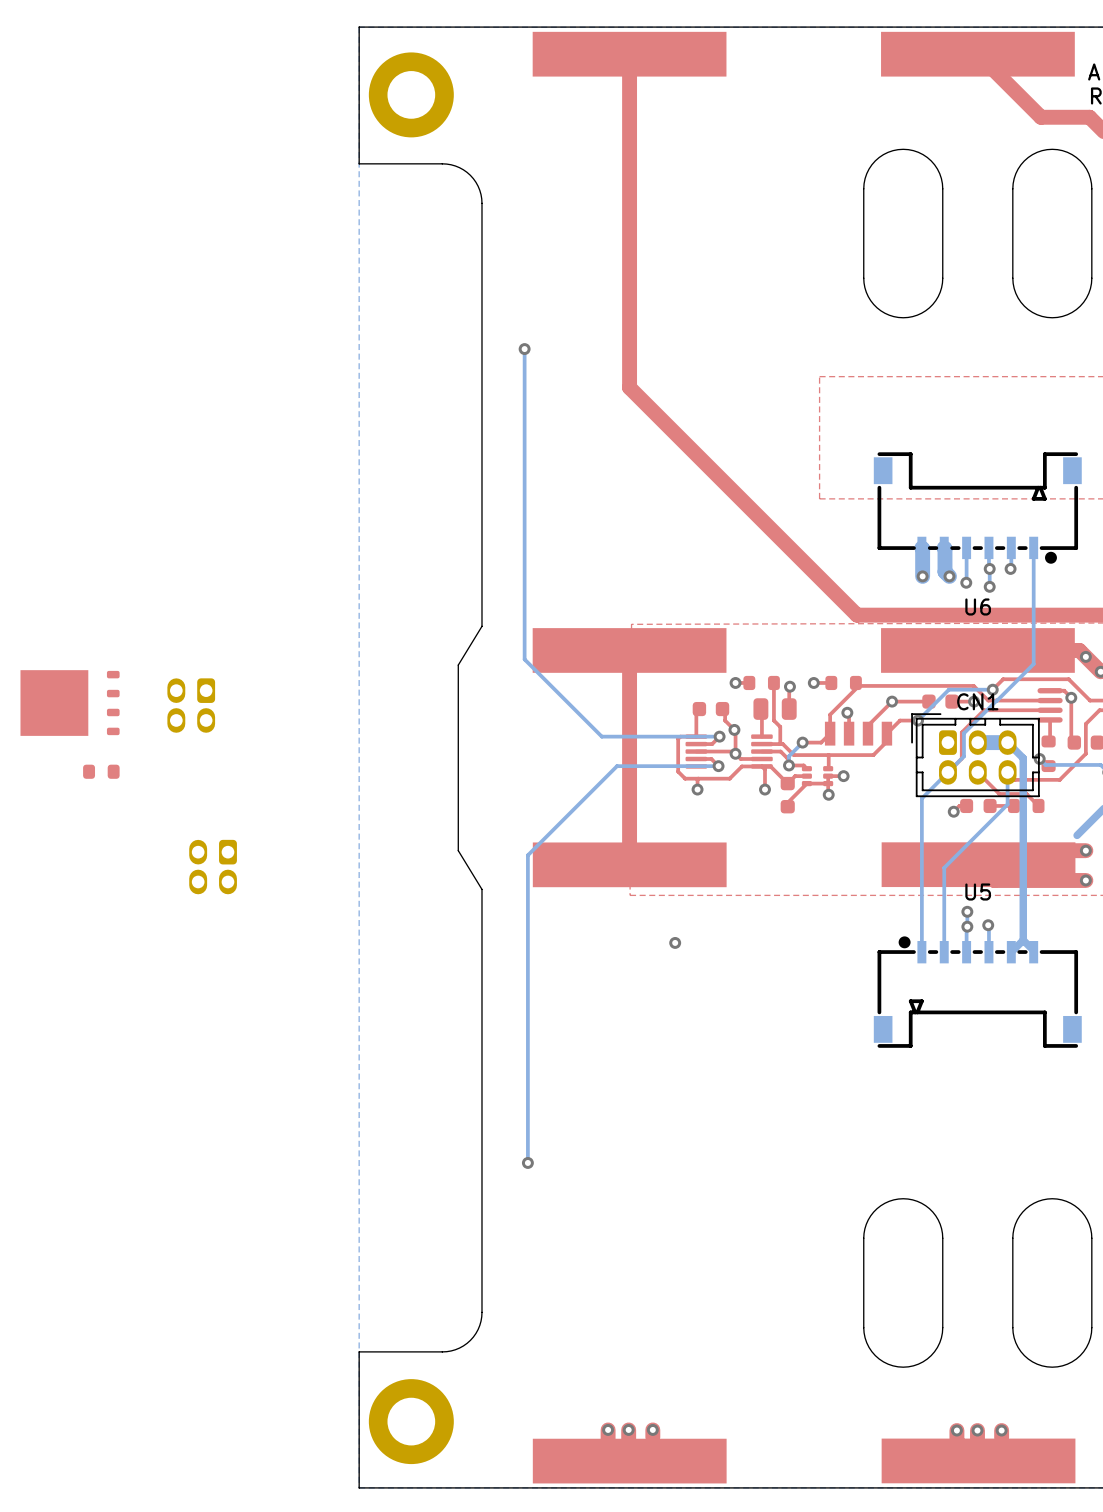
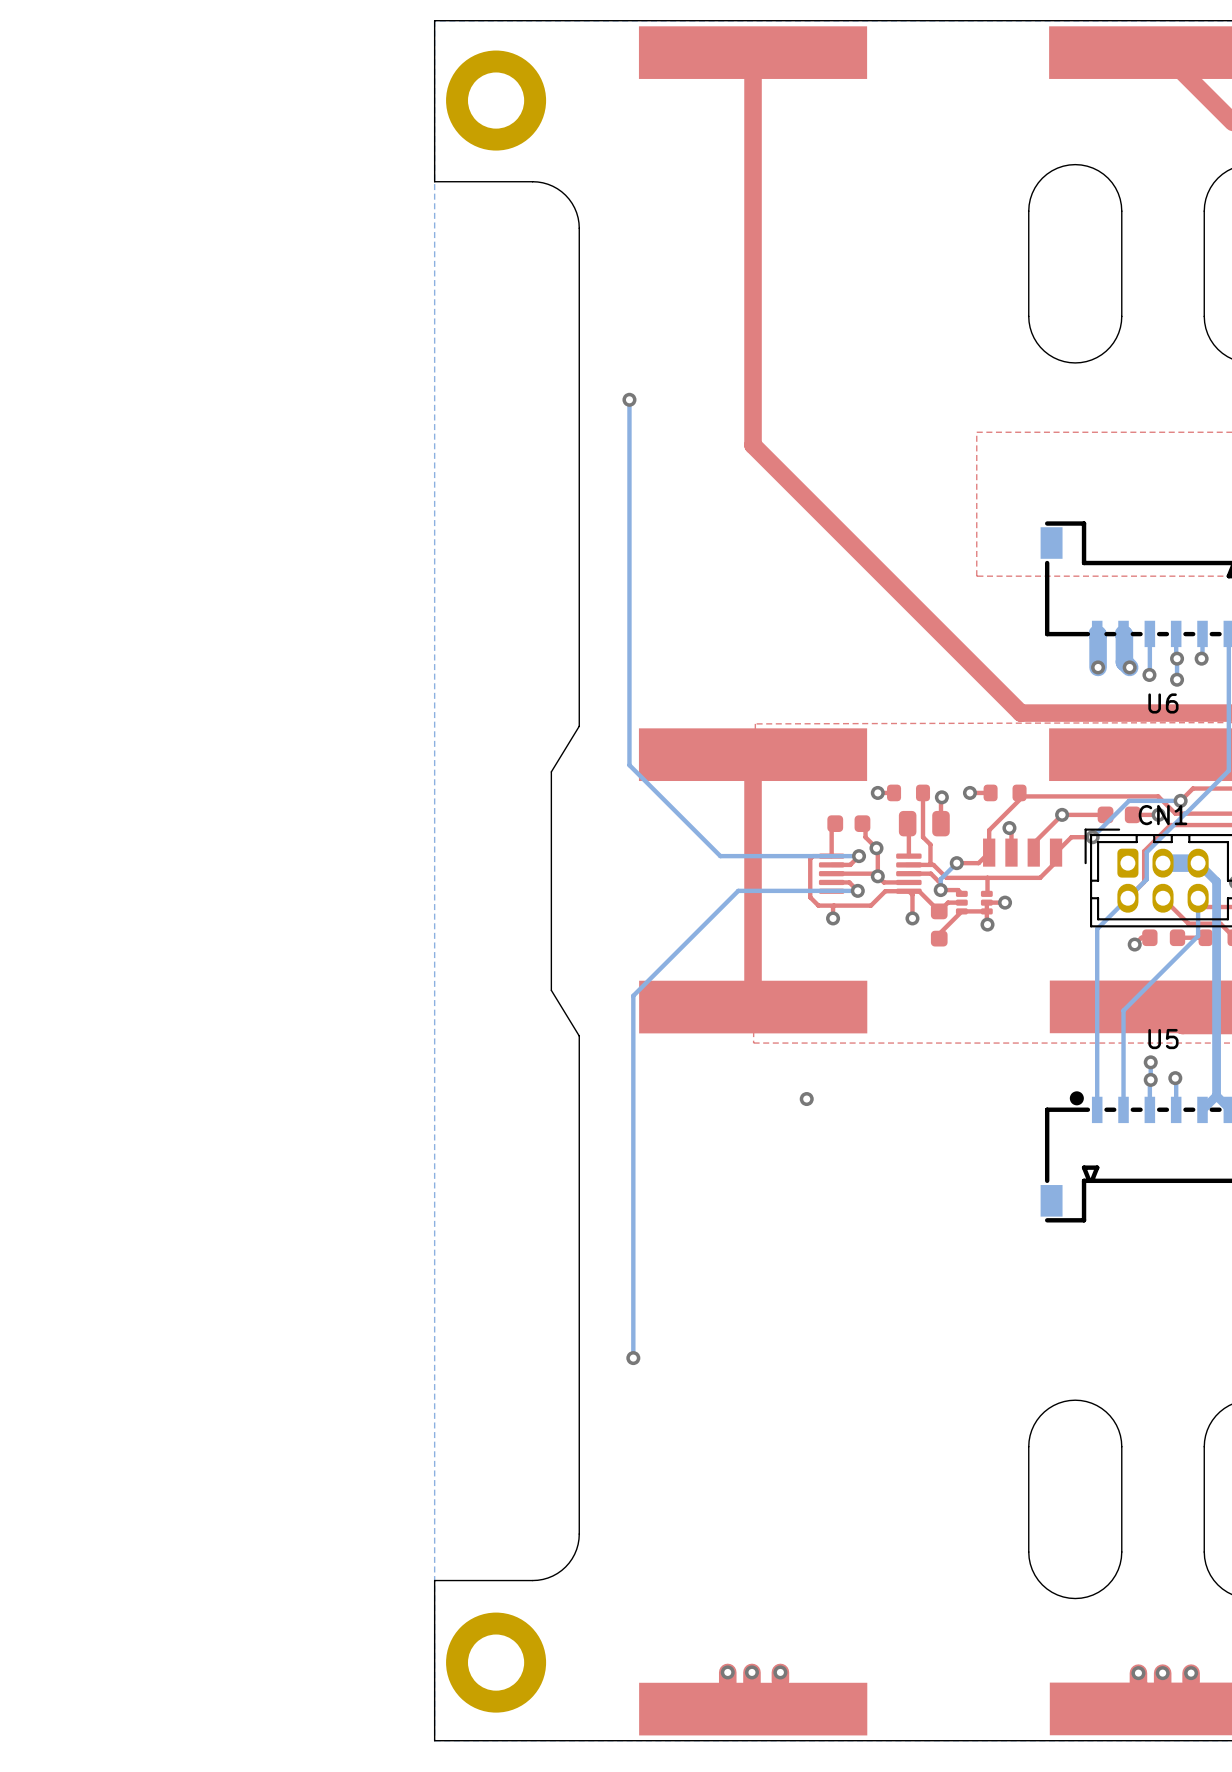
part: (70, 703) -> none
part: (191, 705) -> none
part: (101, 771) -> none
part: (213, 867) -> none

